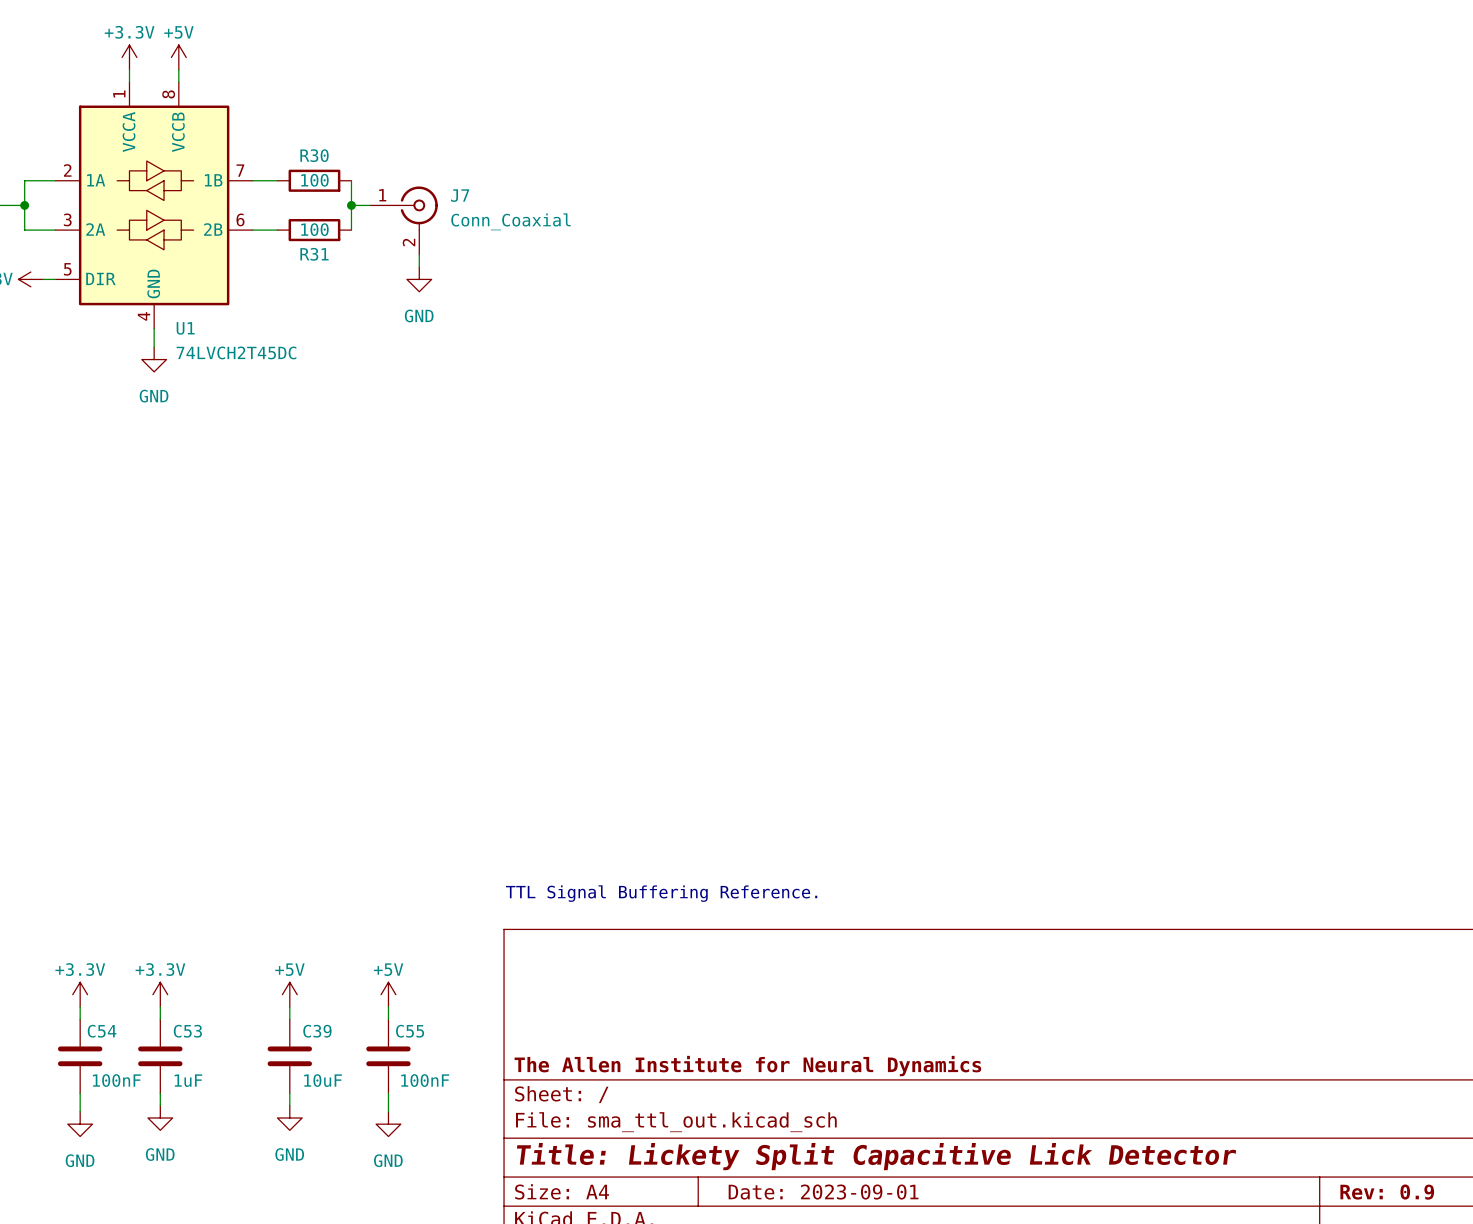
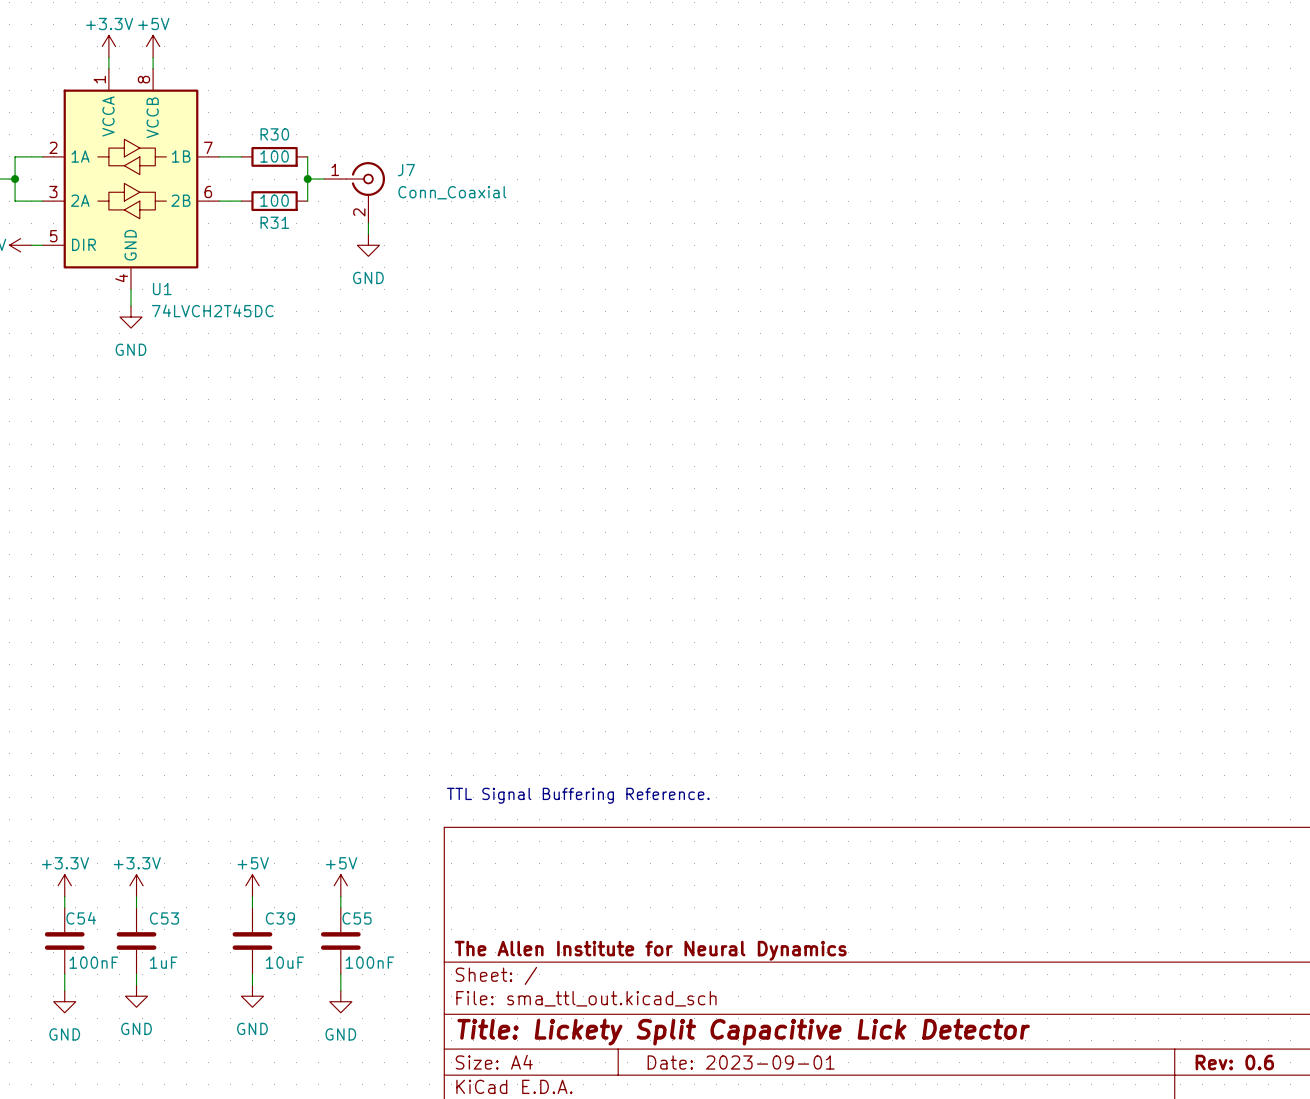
title block: Rev: 0.9 (1387, 1192) -> Rev: 0.6 (1234, 1062)

